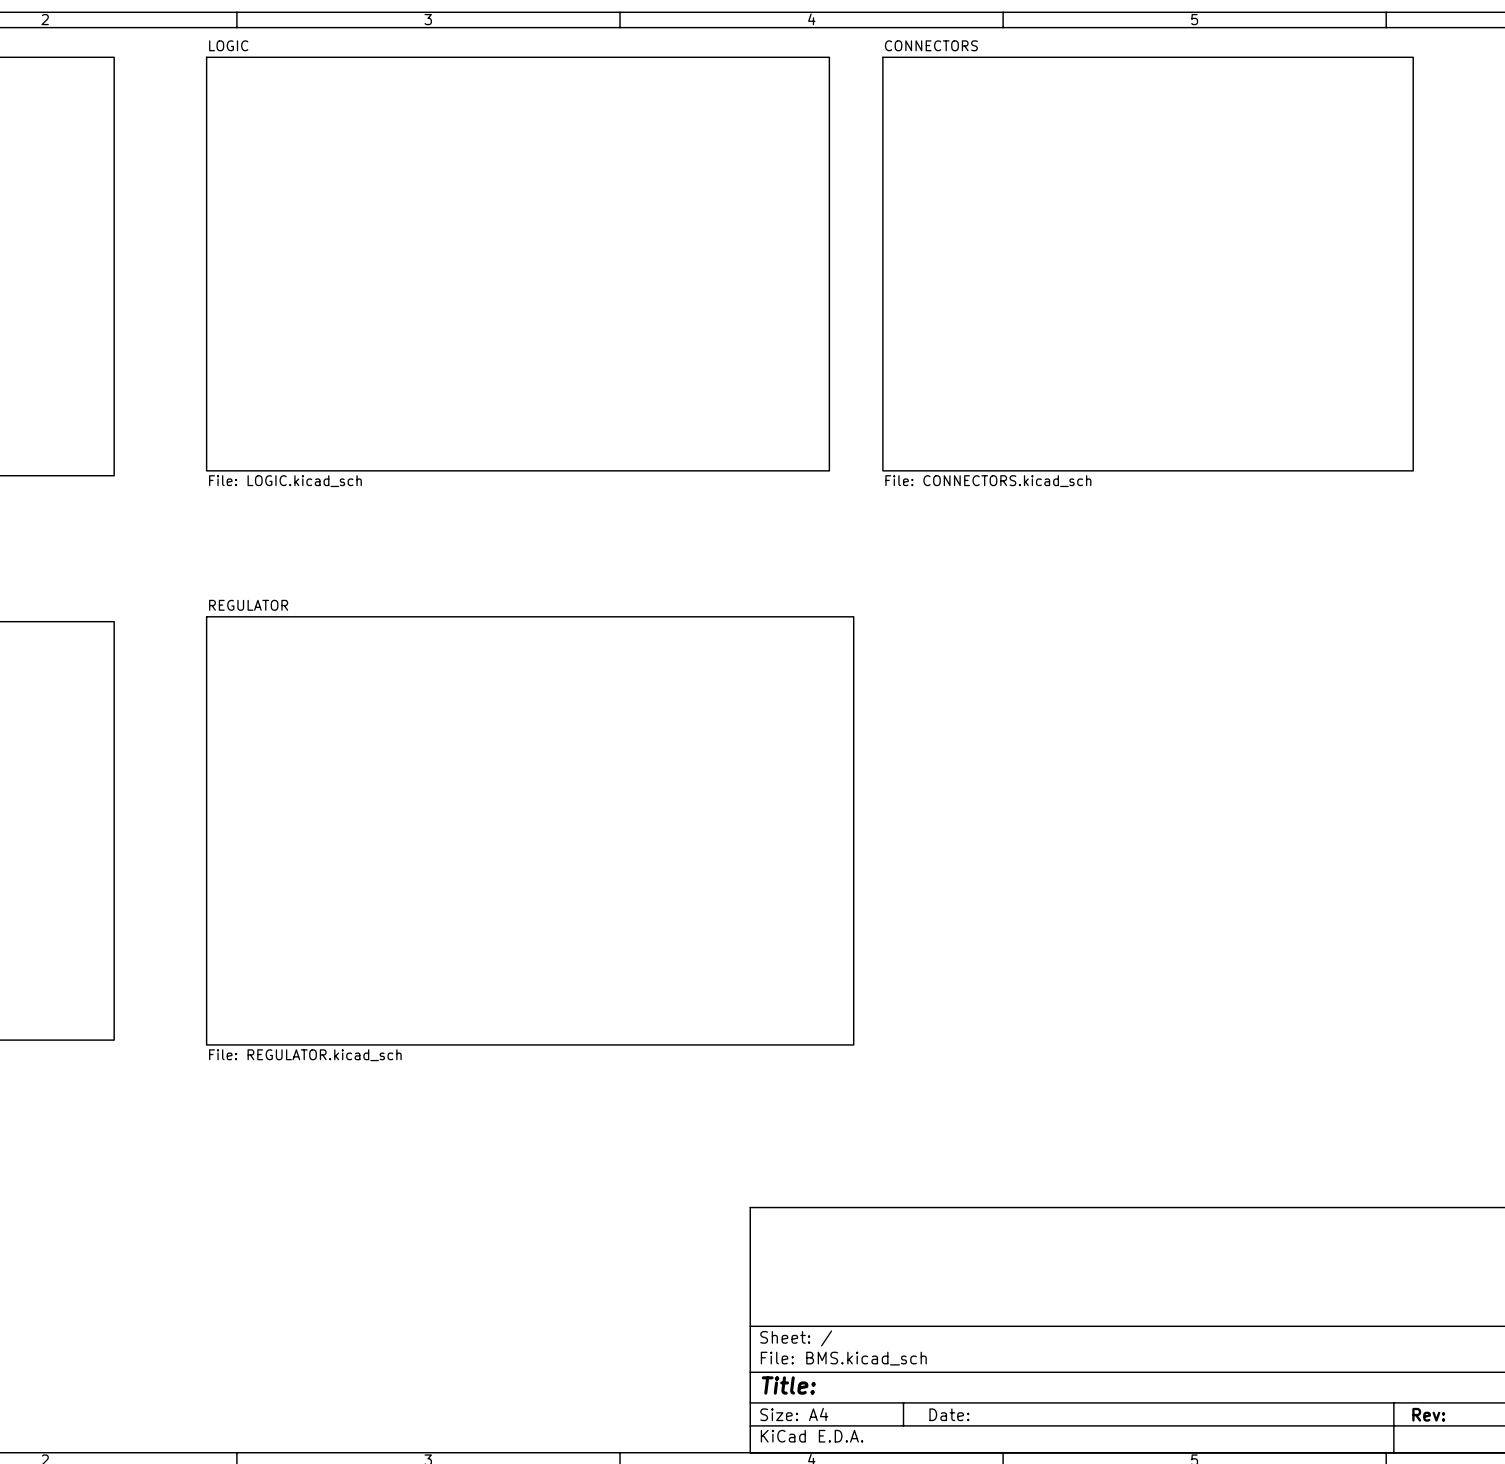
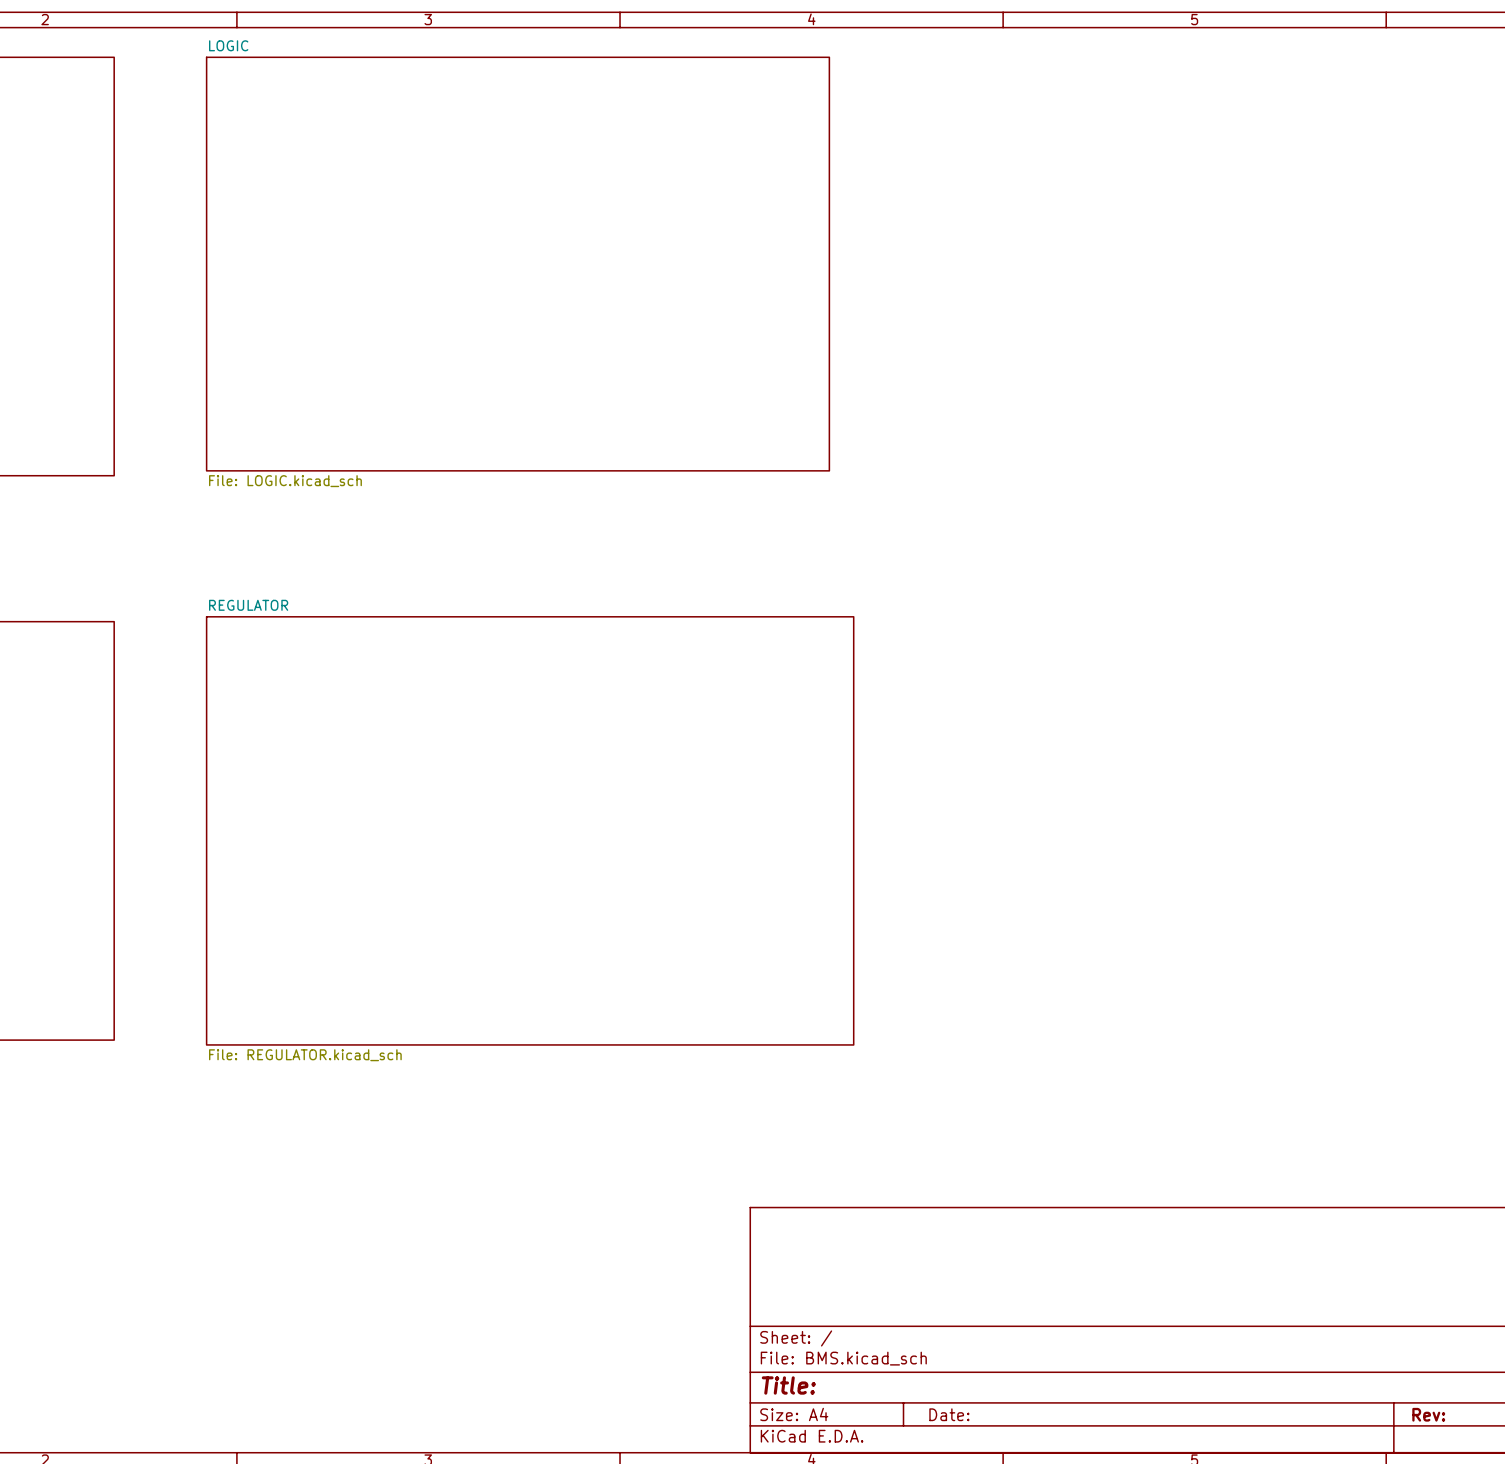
sheet CONNECTORS: File: CONNECTORS.kicad_sch (1148, 264) -> none

